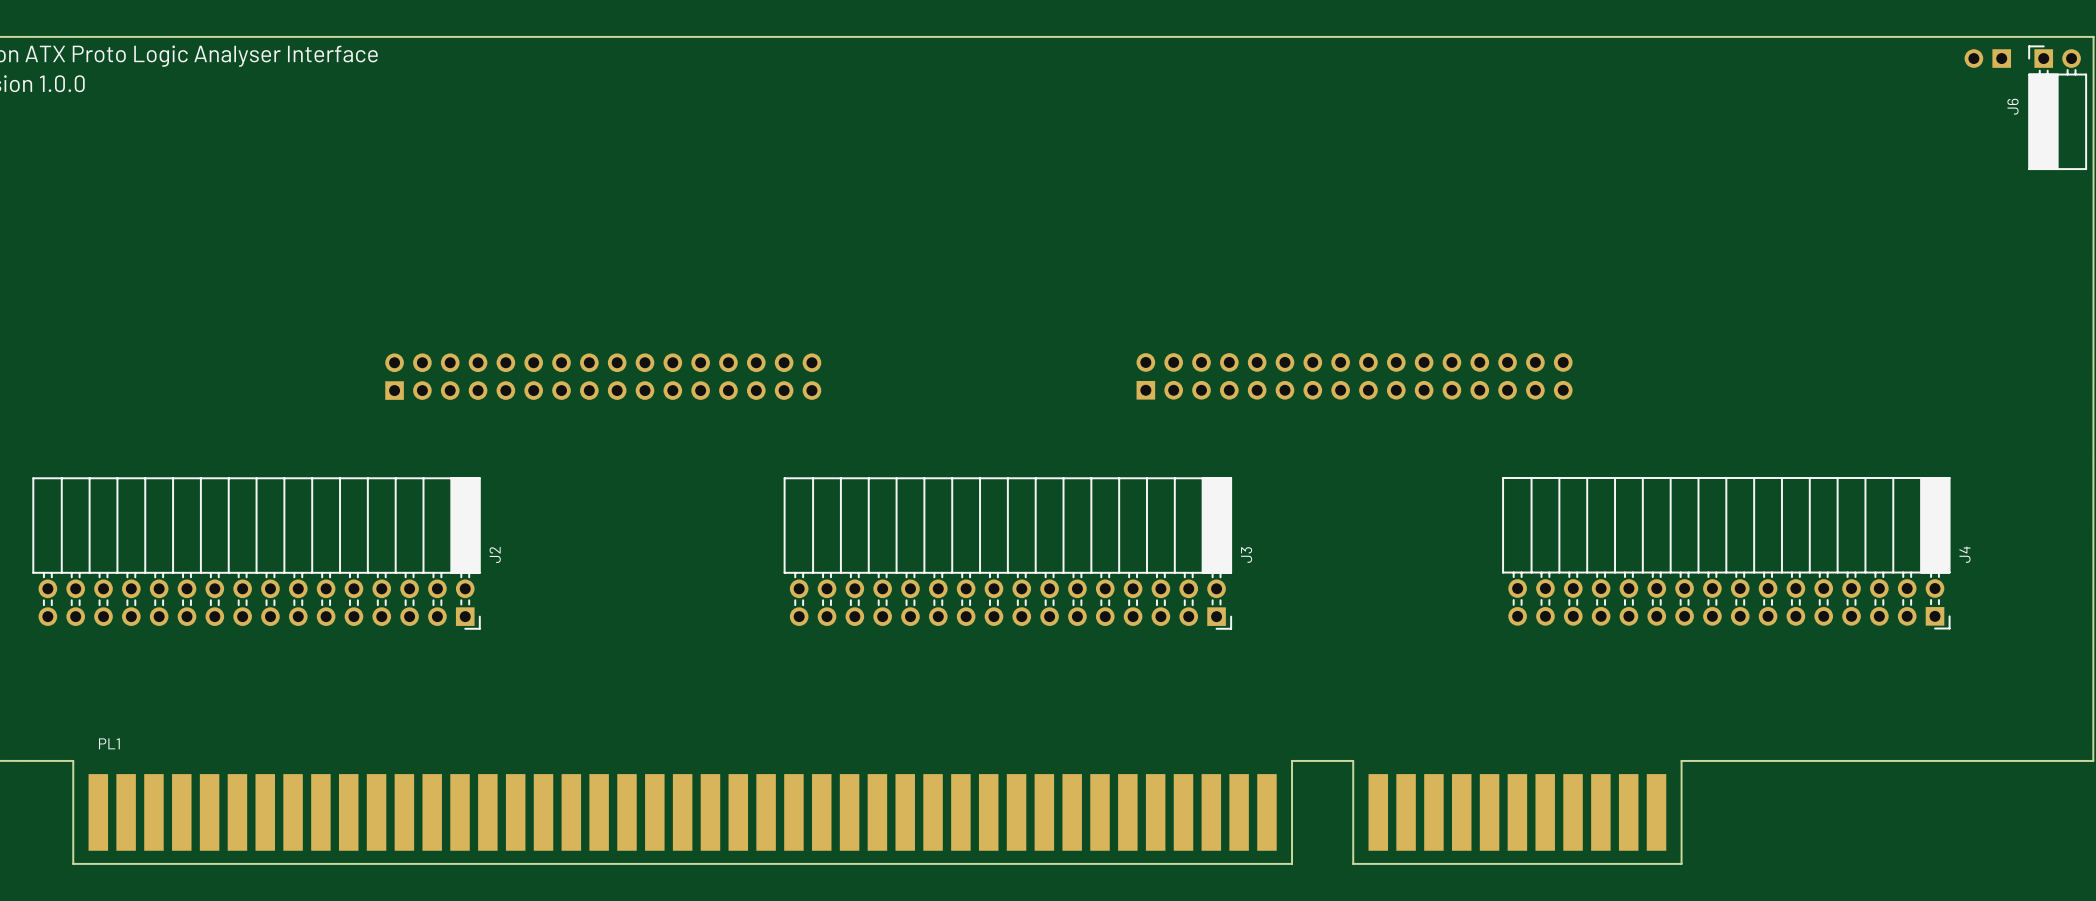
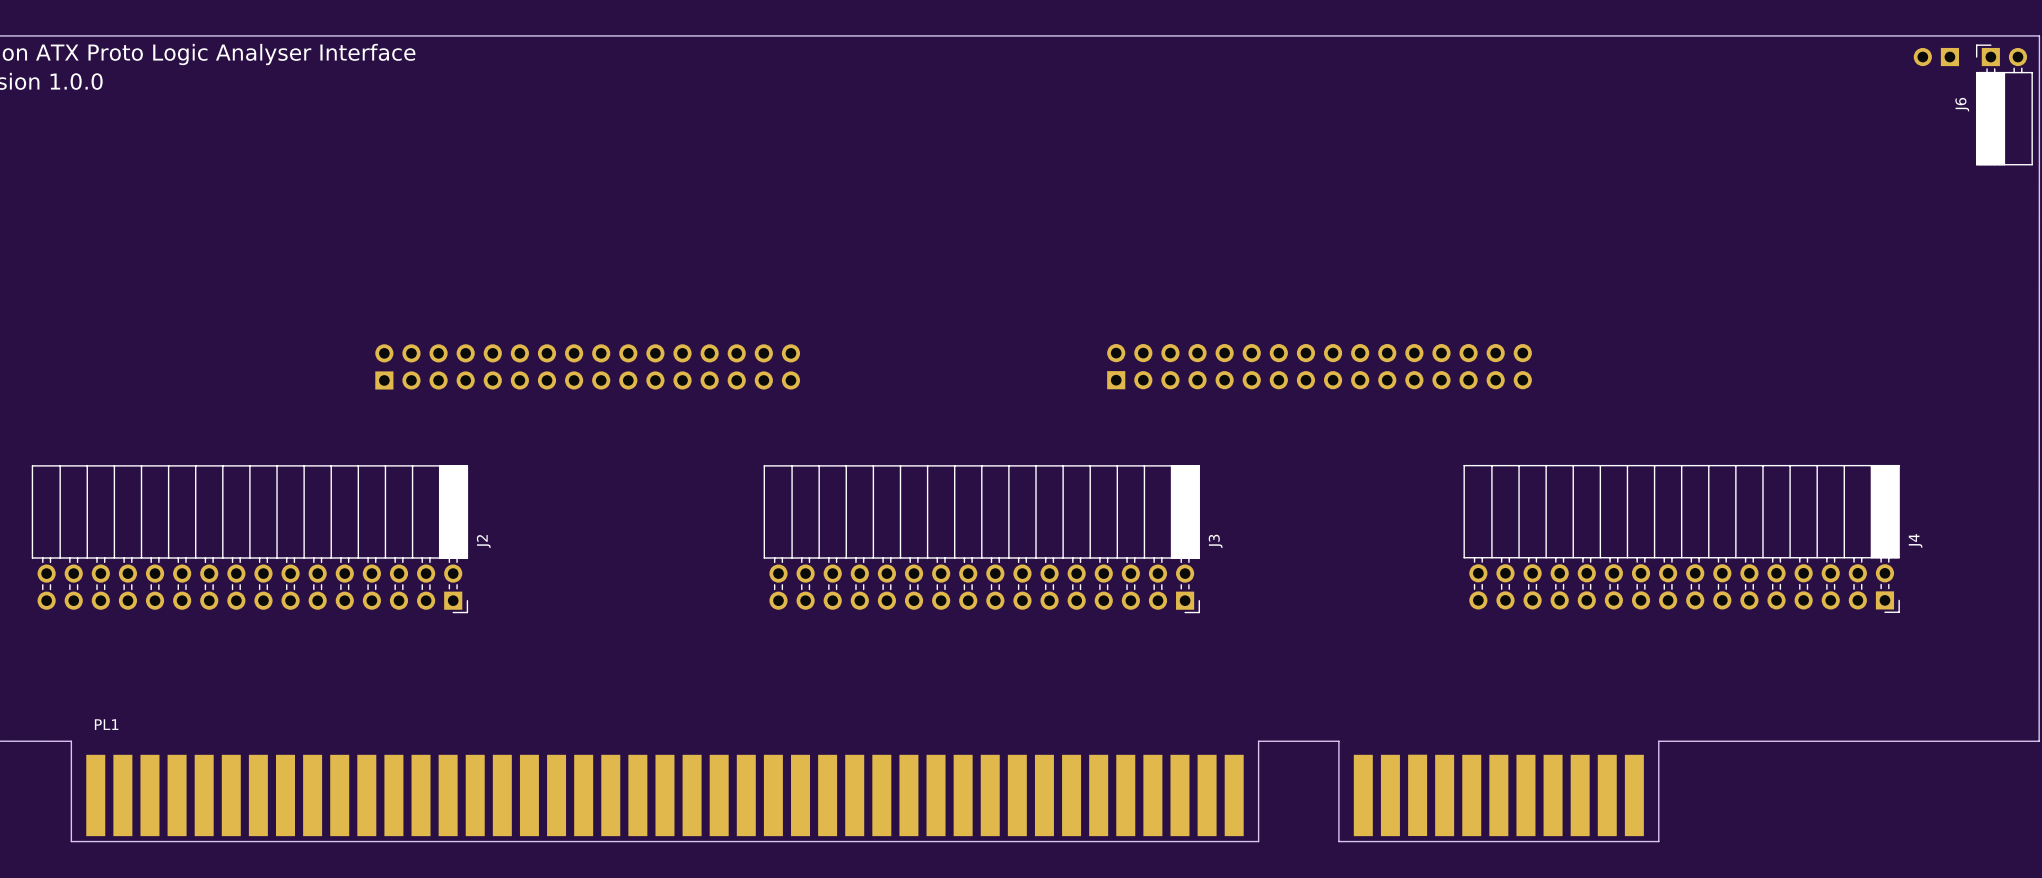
PL1 footprint: [72, 760, 1682, 865] -> [71, 741, 1660, 842]
board edge: (1681, 760) (1702, 760) -> none

